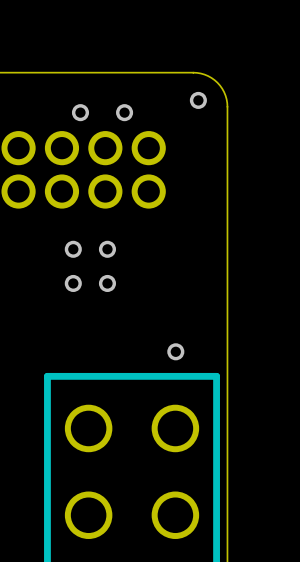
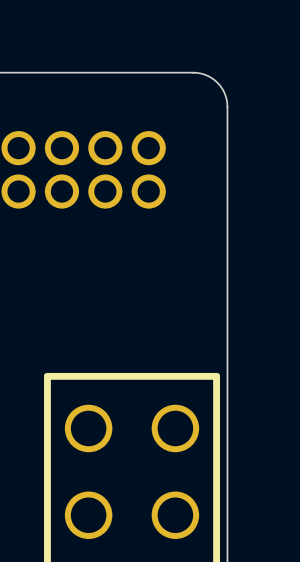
via: (198, 100) -> none
via: (80, 112) -> none
via: (124, 112) -> none
via: (73, 249) -> none
via: (107, 249) -> none
via: (73, 283) -> none
via: (107, 283) -> none
via: (175, 351) -> none

